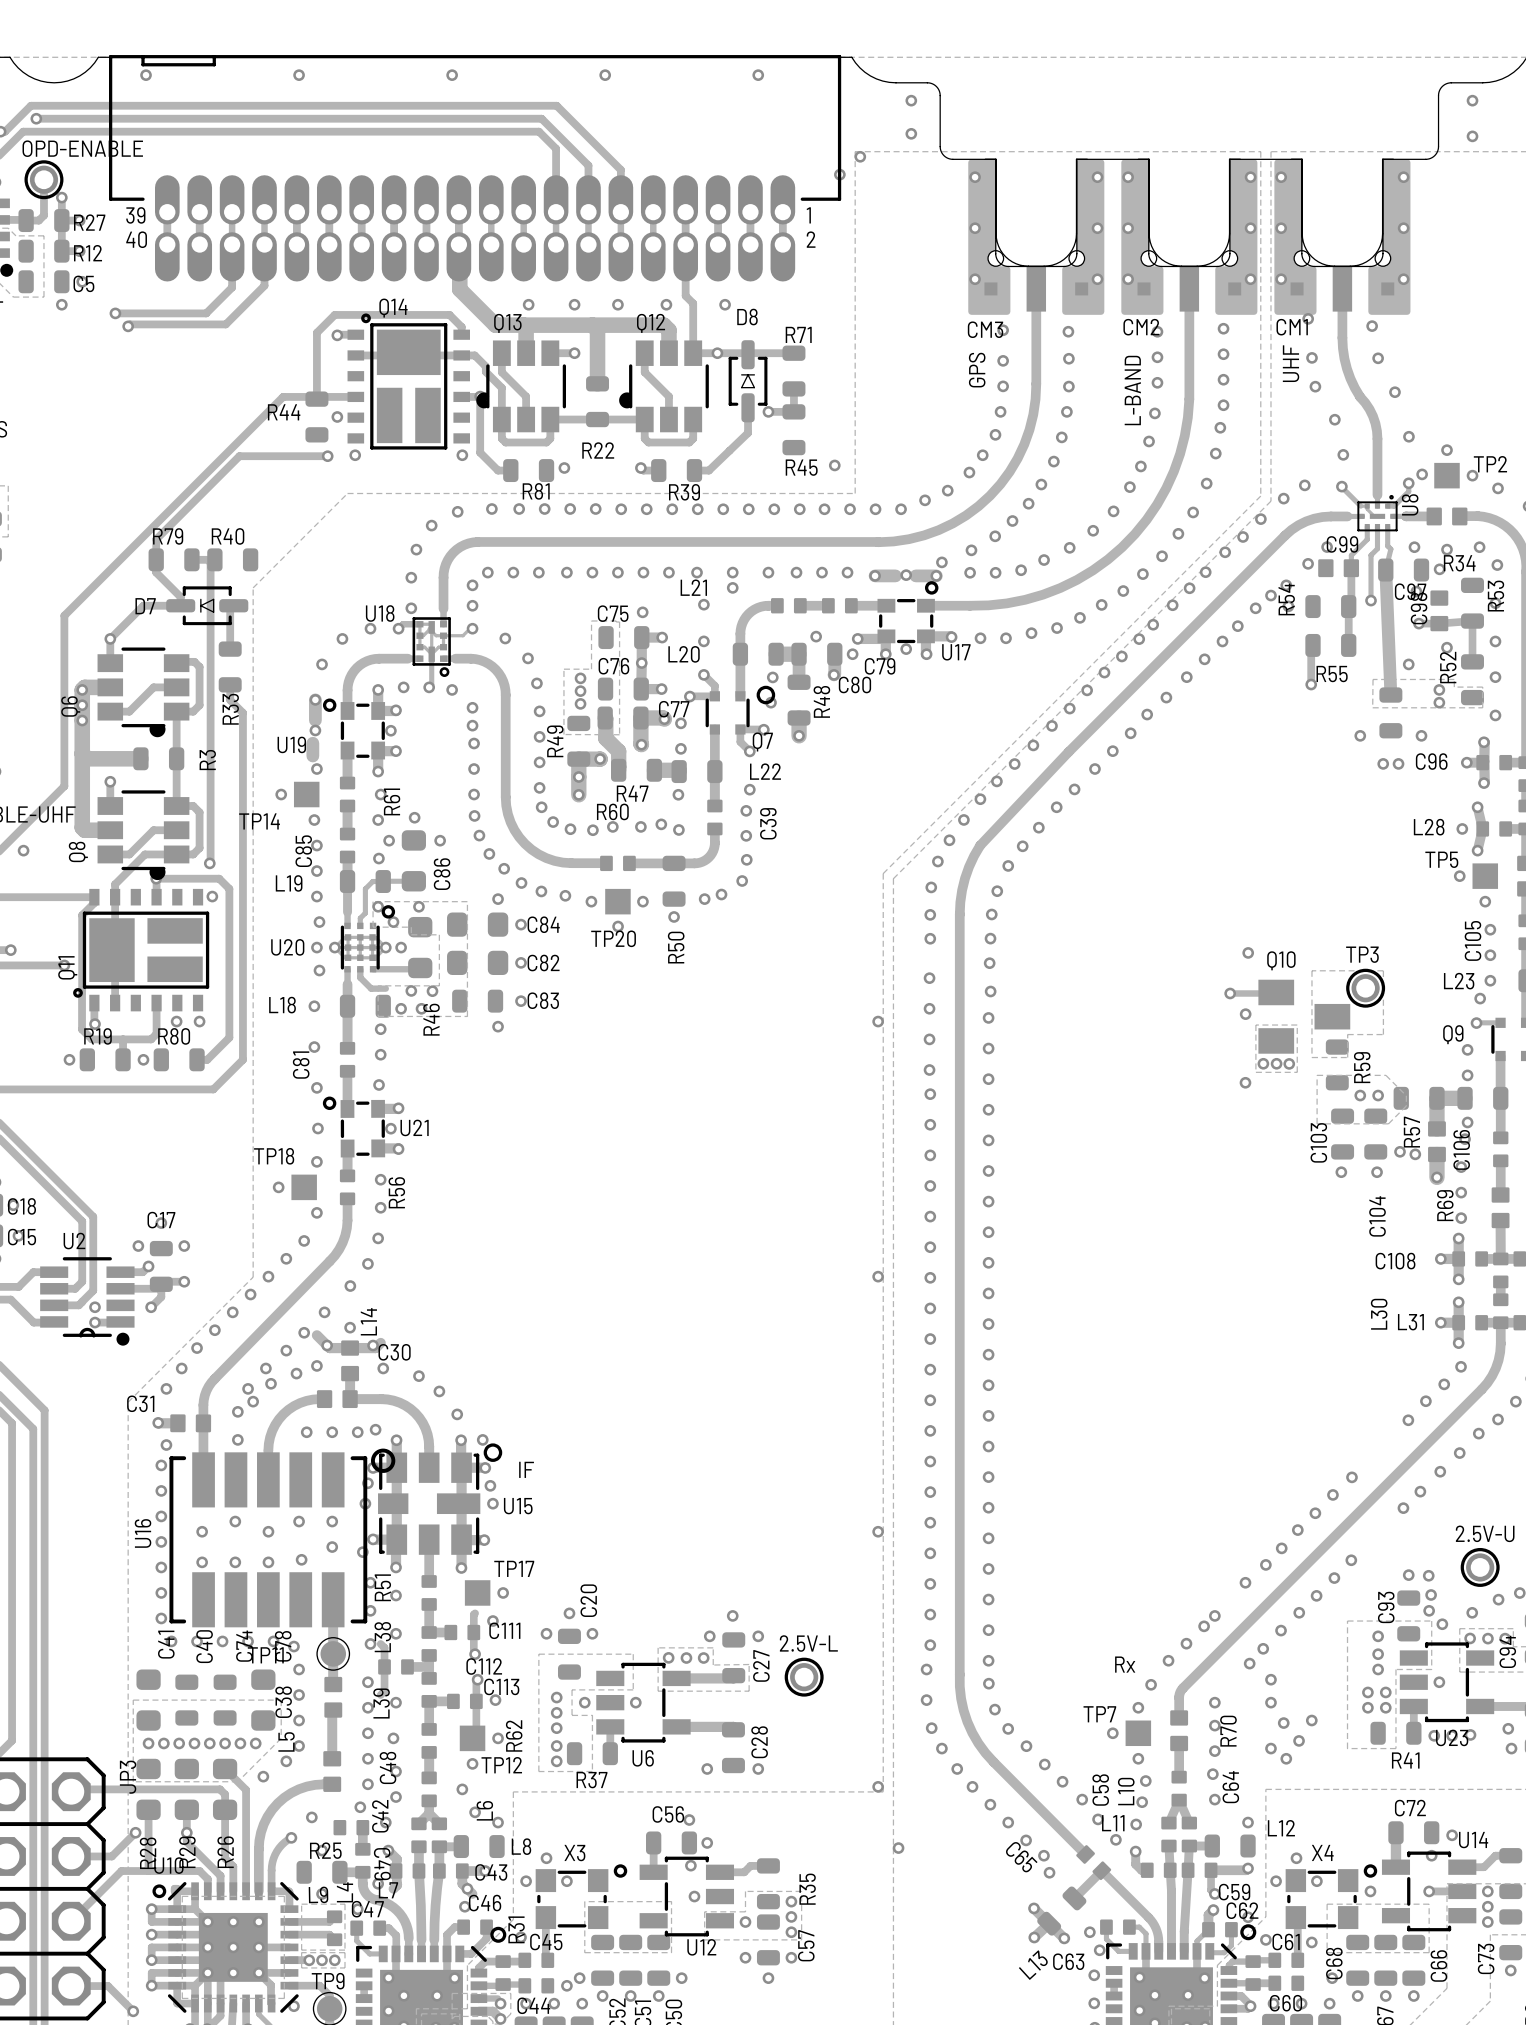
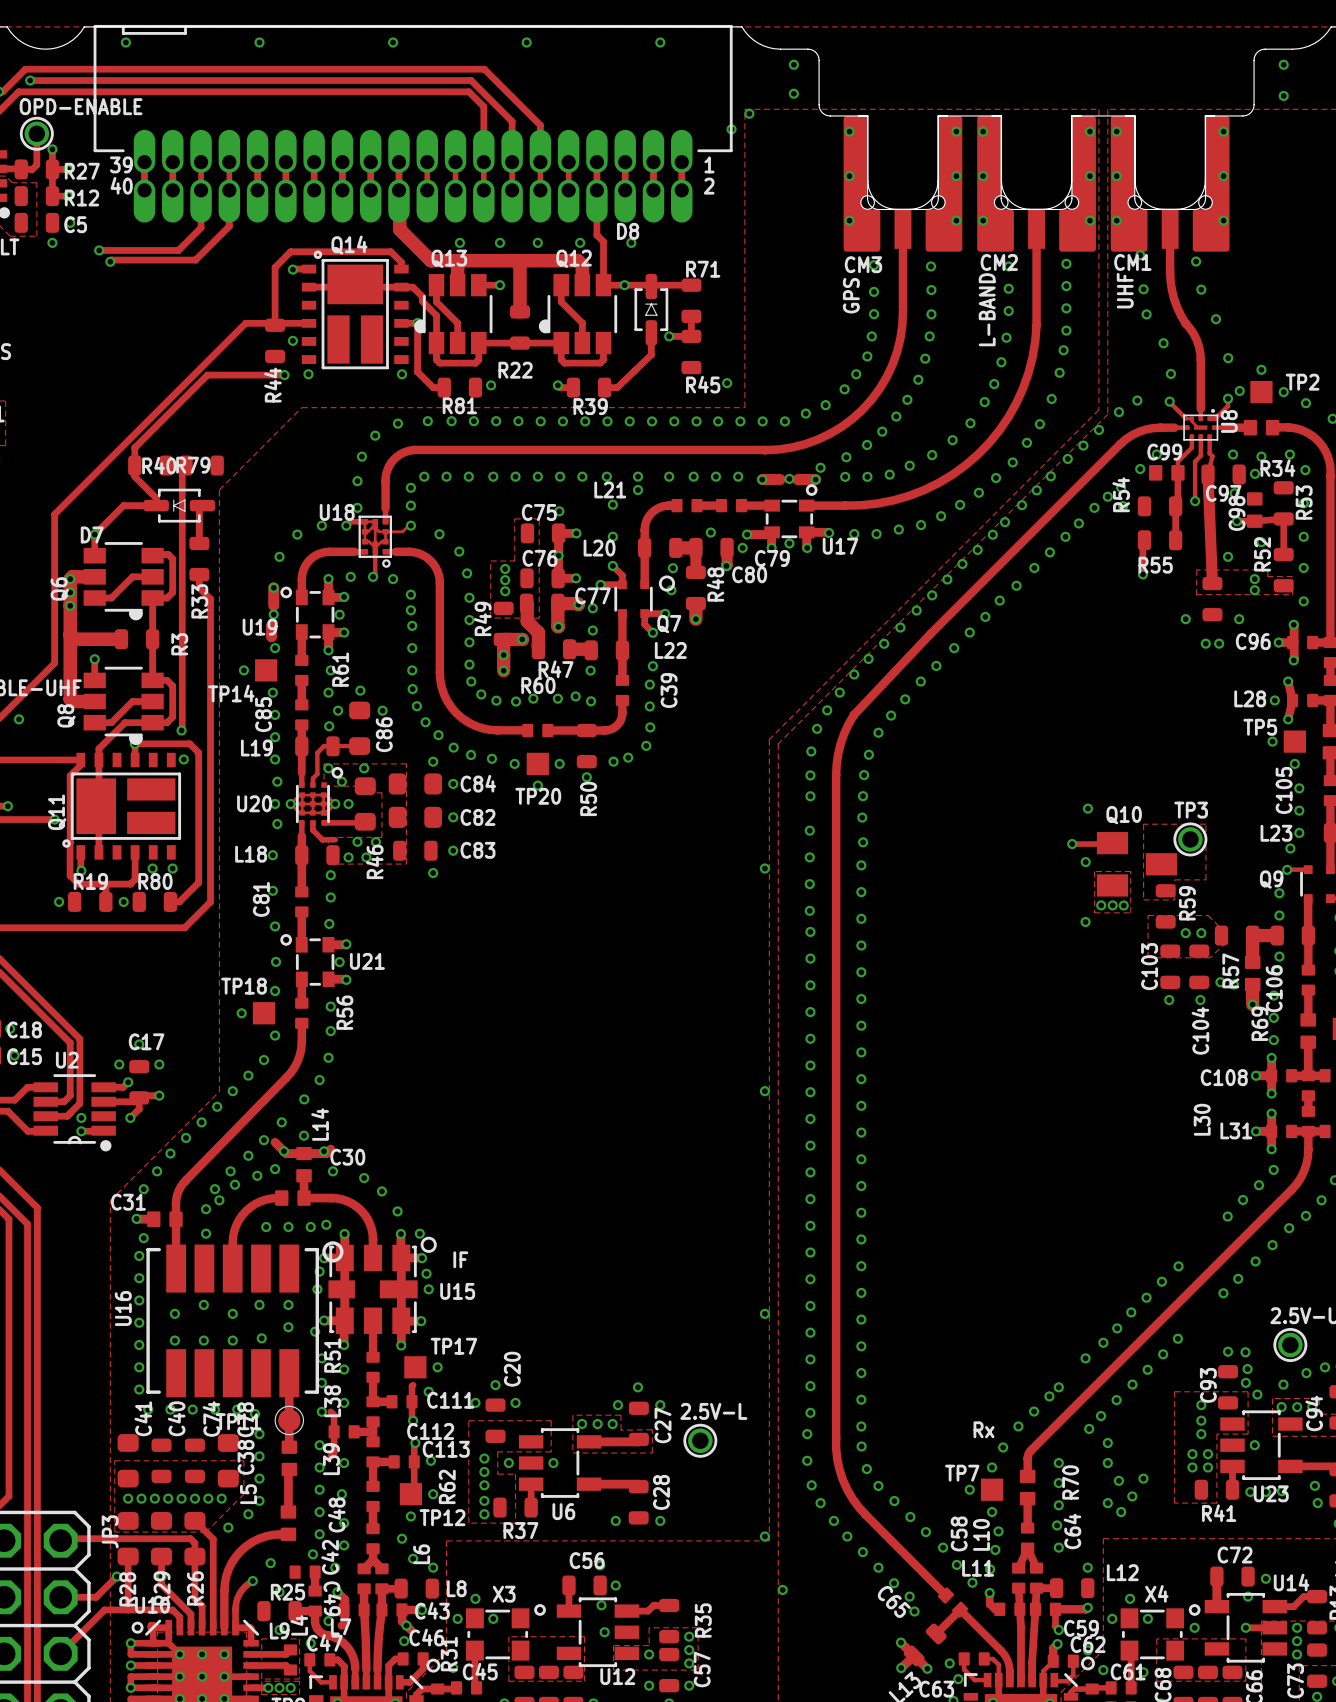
D8 name position: D8 (747, 317) -> D8 (628, 231)
R44 name rotation: 0° (284, 412) -> 90° counterclockwise (272, 385)
R44 name position: R44 (284, 412) -> R44 (272, 385)
R79 name position: R79 (168, 536) -> R79 (193, 465)
R40 name position: R40 (228, 536) -> R40 (159, 465)
D7 name position: D7 (145, 606) -> D7 (92, 534)

